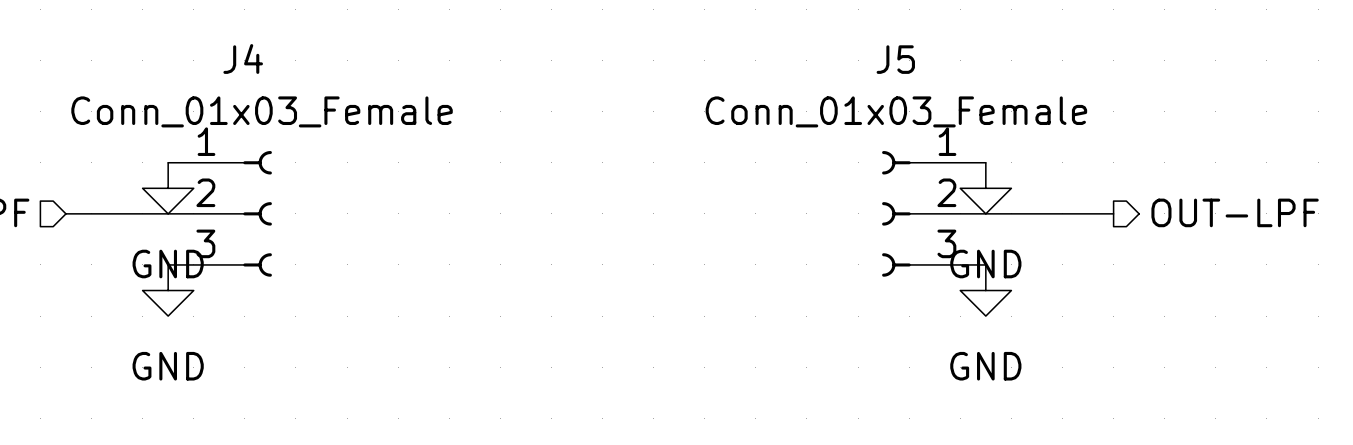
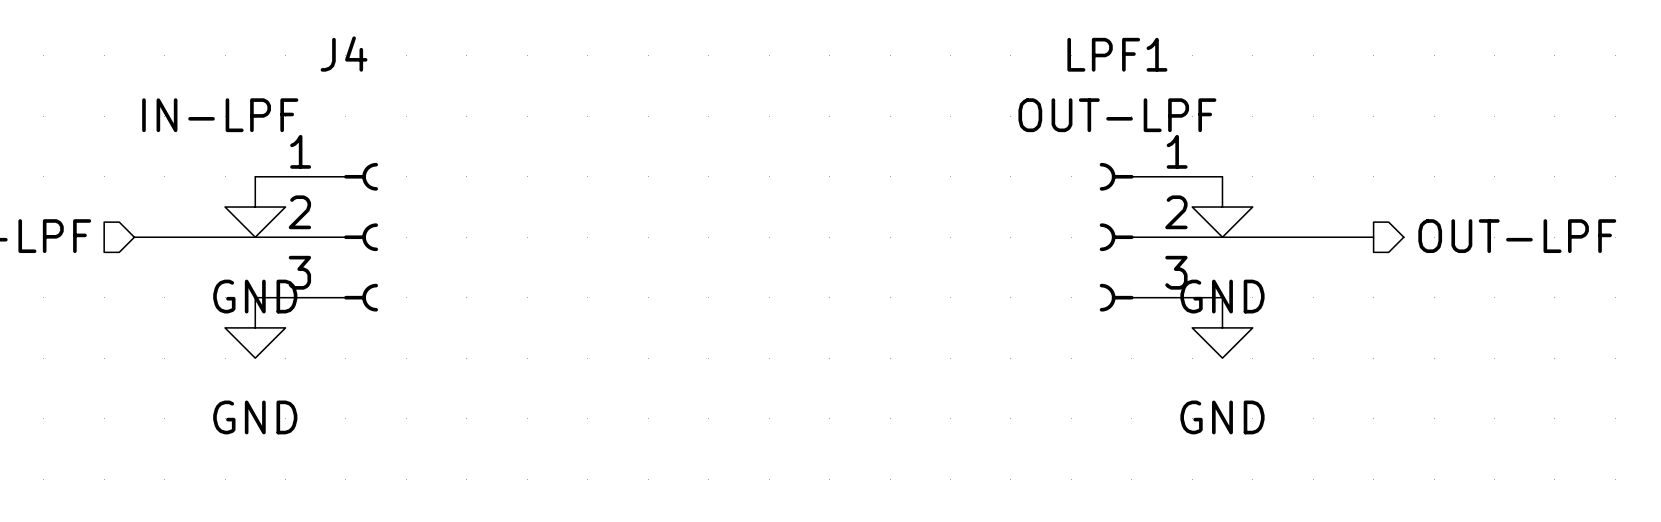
J5 name: J5 (895, 59) -> LPF1 (1117, 54)
J4 value: Conn_01x03_Female (262, 111) -> IN-LPF (220, 115)
J5 value: Conn_01x03_Female (896, 111) -> OUT-LPF (1117, 115)

